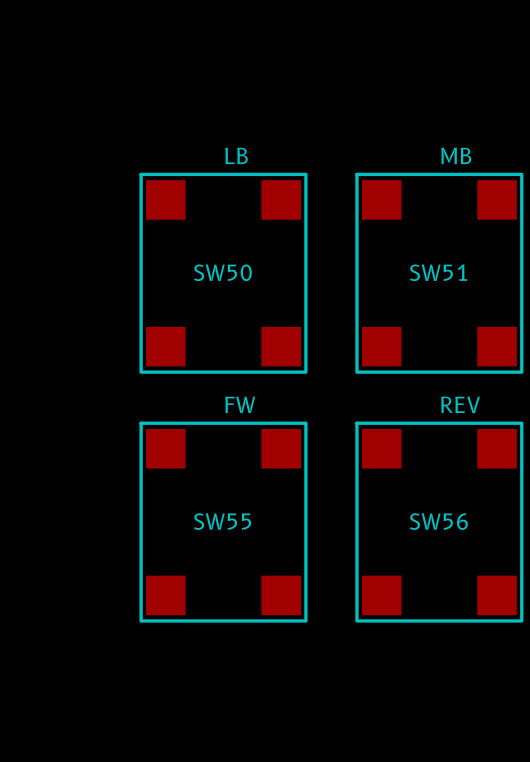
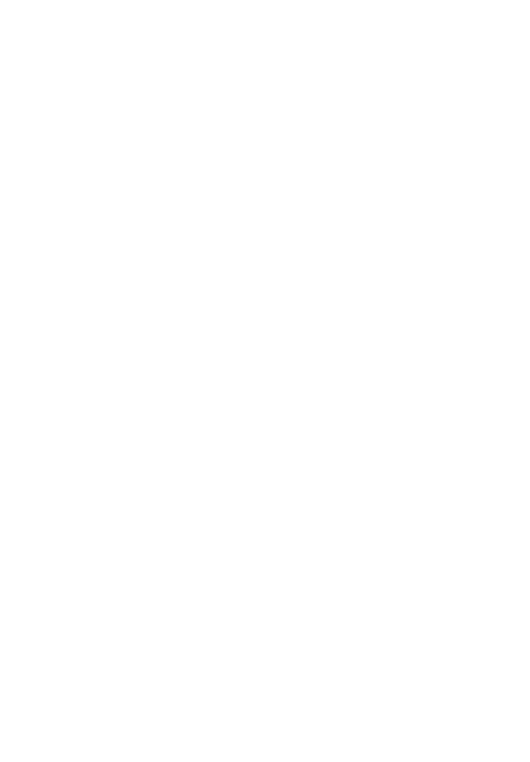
SW50: (223, 273) -> none
SW51: (439, 273) -> none
SW55: (223, 522) -> none
SW56: (439, 522) -> none

